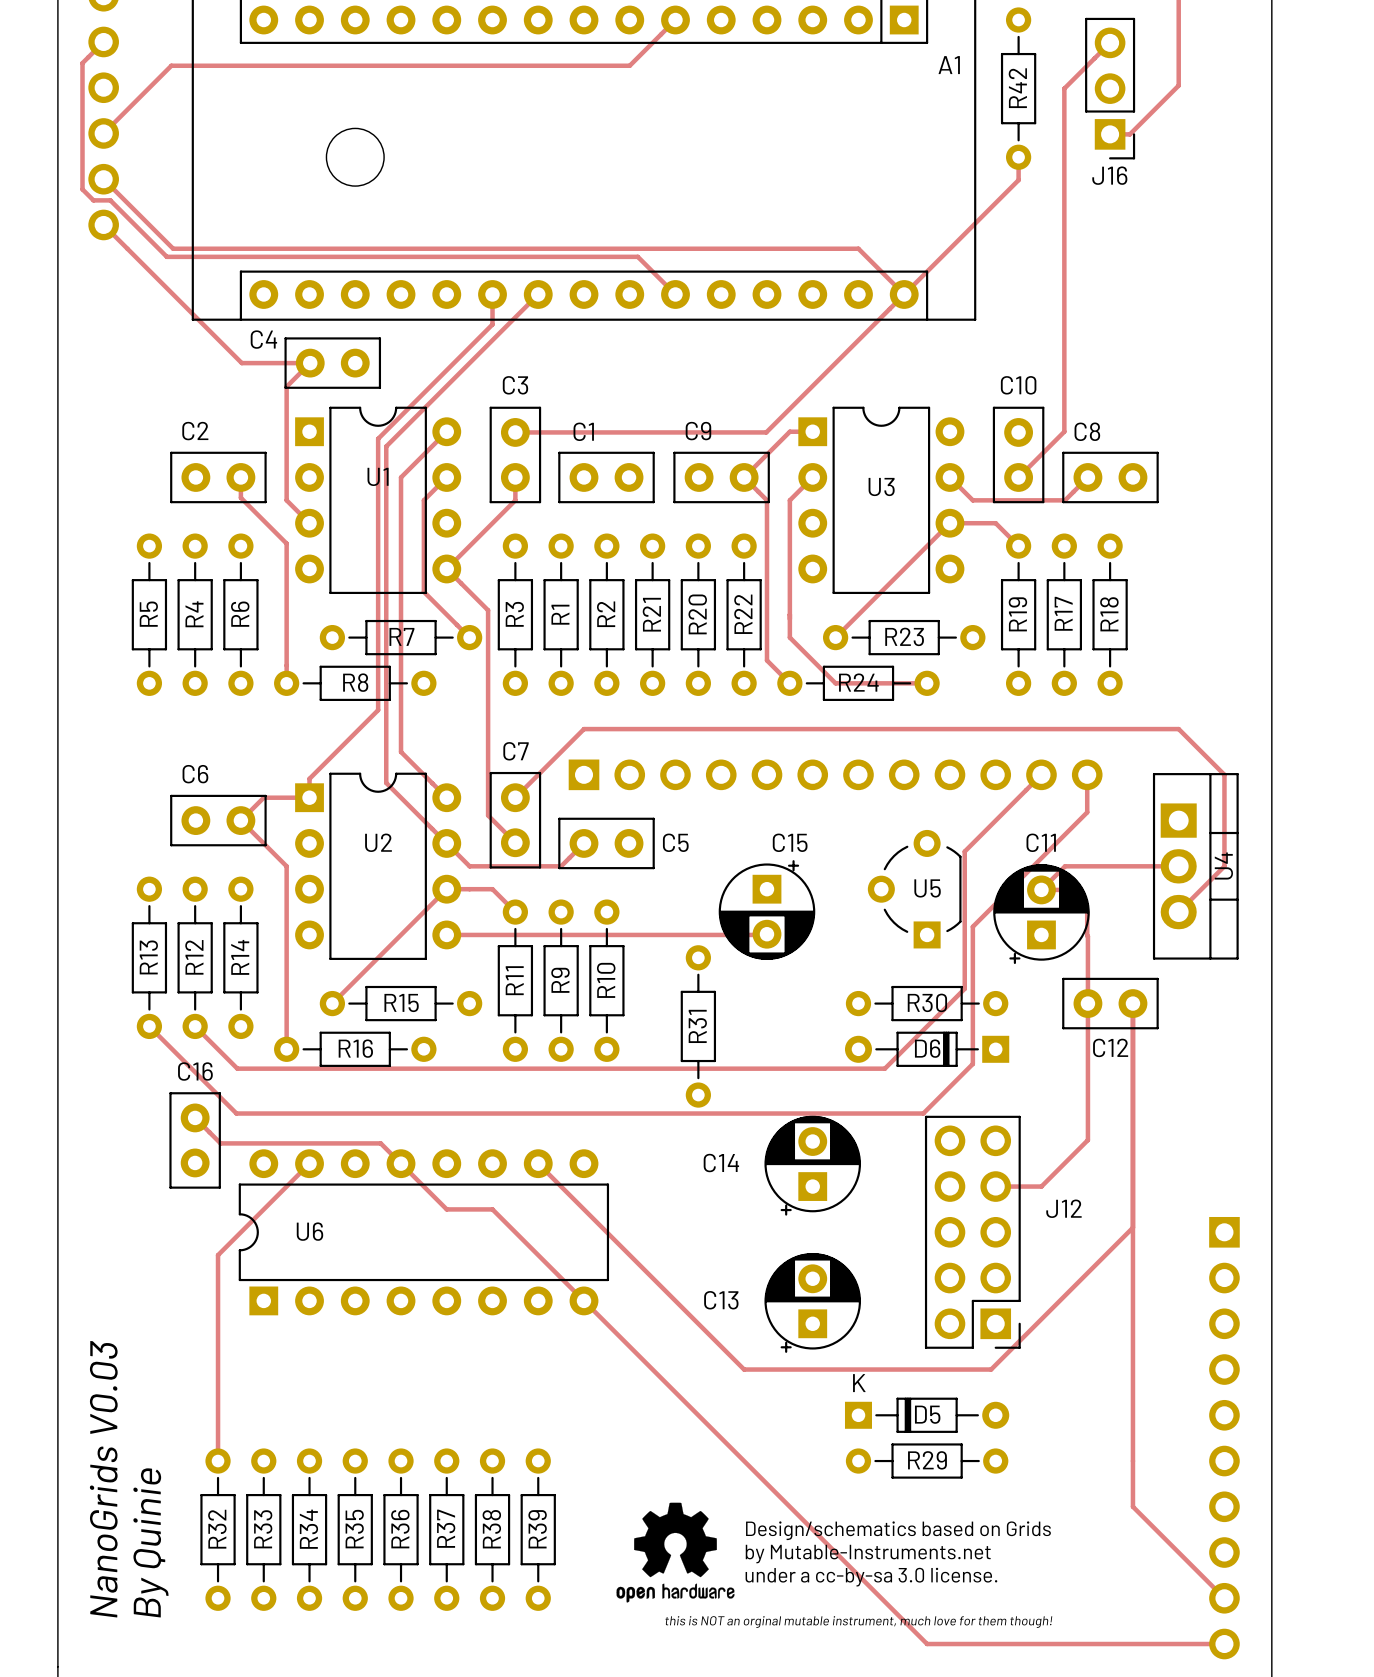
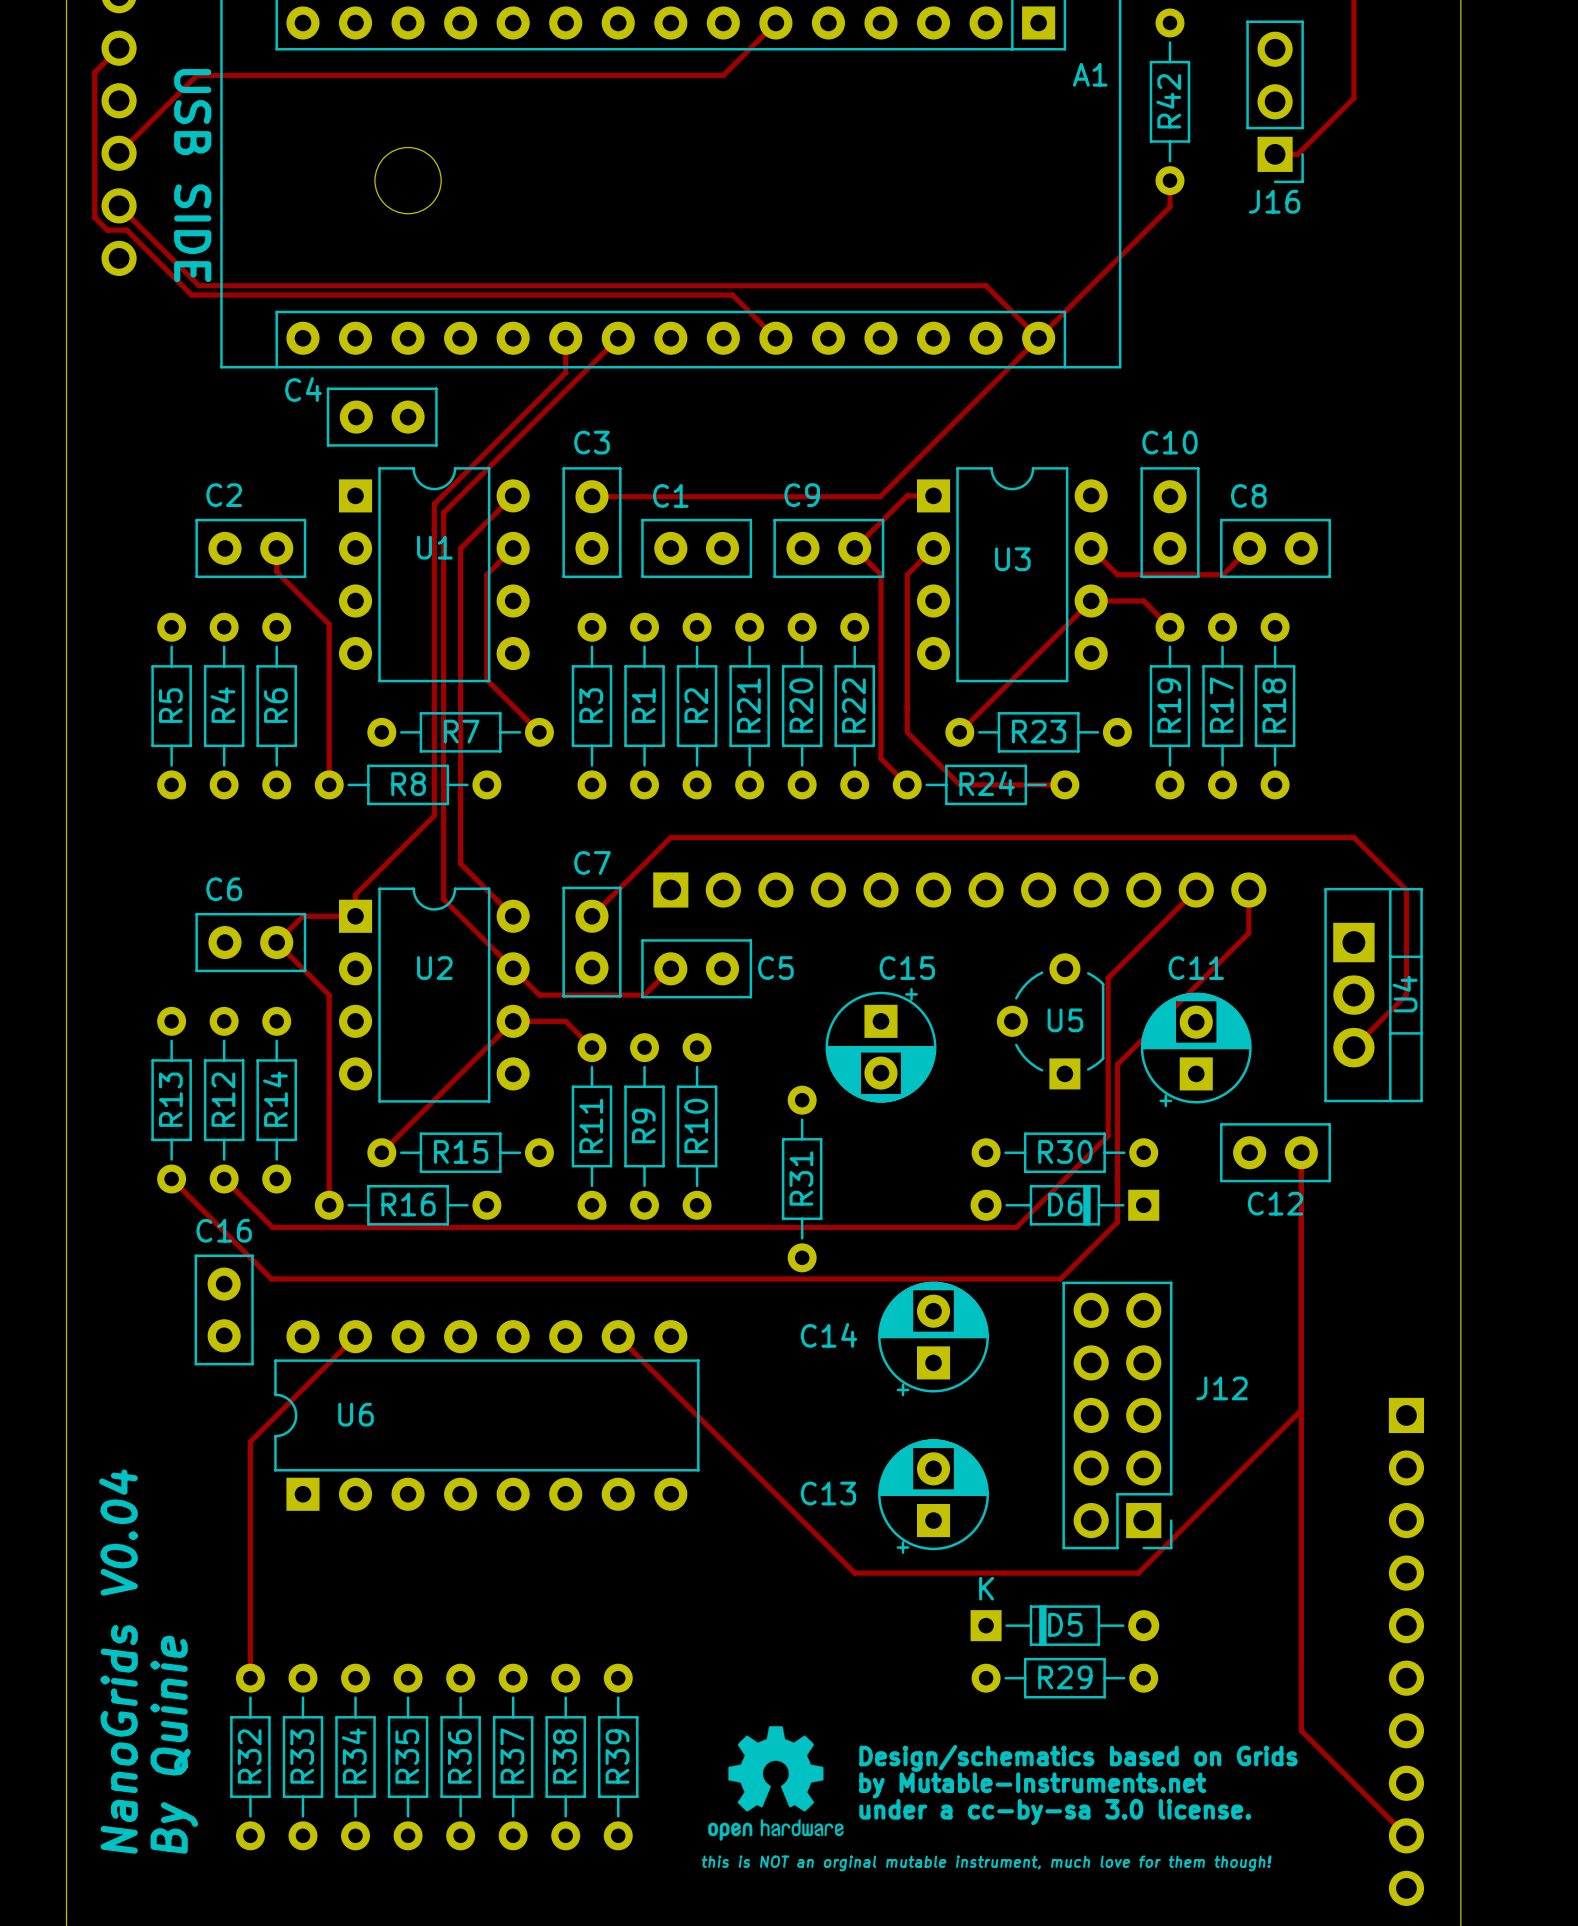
track: (1110, 42) (1064, 88) (1064, 431) (1018, 477) -> none
text: none -> USB SIDE (192, 175)
track: (103, 224) (241, 363) (310, 363) (286, 386) (286, 500) (309, 523) -> none
track: (515, 477) (515, 500) (446, 568) (488, 610) (488, 815) (515, 842) -> none
track: (1178, 866) (1065, 866) (1041, 889) (1065, 889) (1087, 912) (1087, 1140) (1041, 1186) (995, 1186) -> none
track: (446, 934) (766, 934) -> none
track: (195, 1117) (220, 1143) (380, 1143) (446, 1209) (492, 1209) (927, 1644) (1224, 1644) -> none
text: NanoGrids V0.03 (103, 1479) -> NanoGrids V0.04 (118, 1661)

